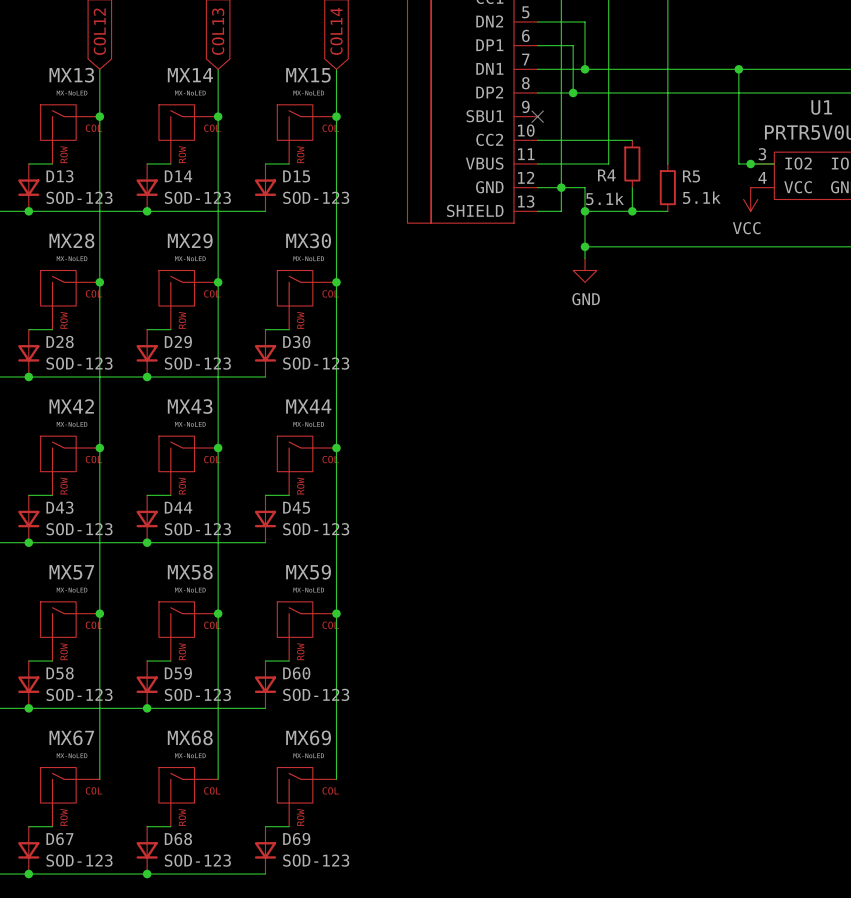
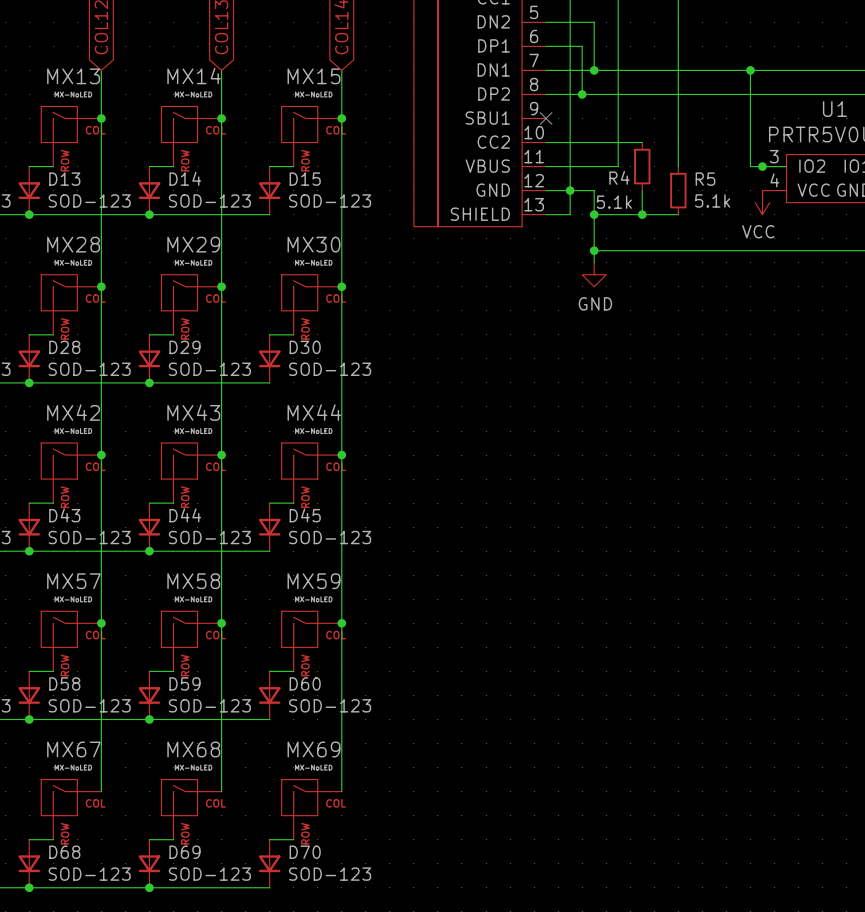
D67 name: D67 (59, 839) -> D68 (64, 852)
D68 name: D68 (178, 839) -> D69 (184, 852)
D69 name: D69 (296, 839) -> D70 (305, 852)

